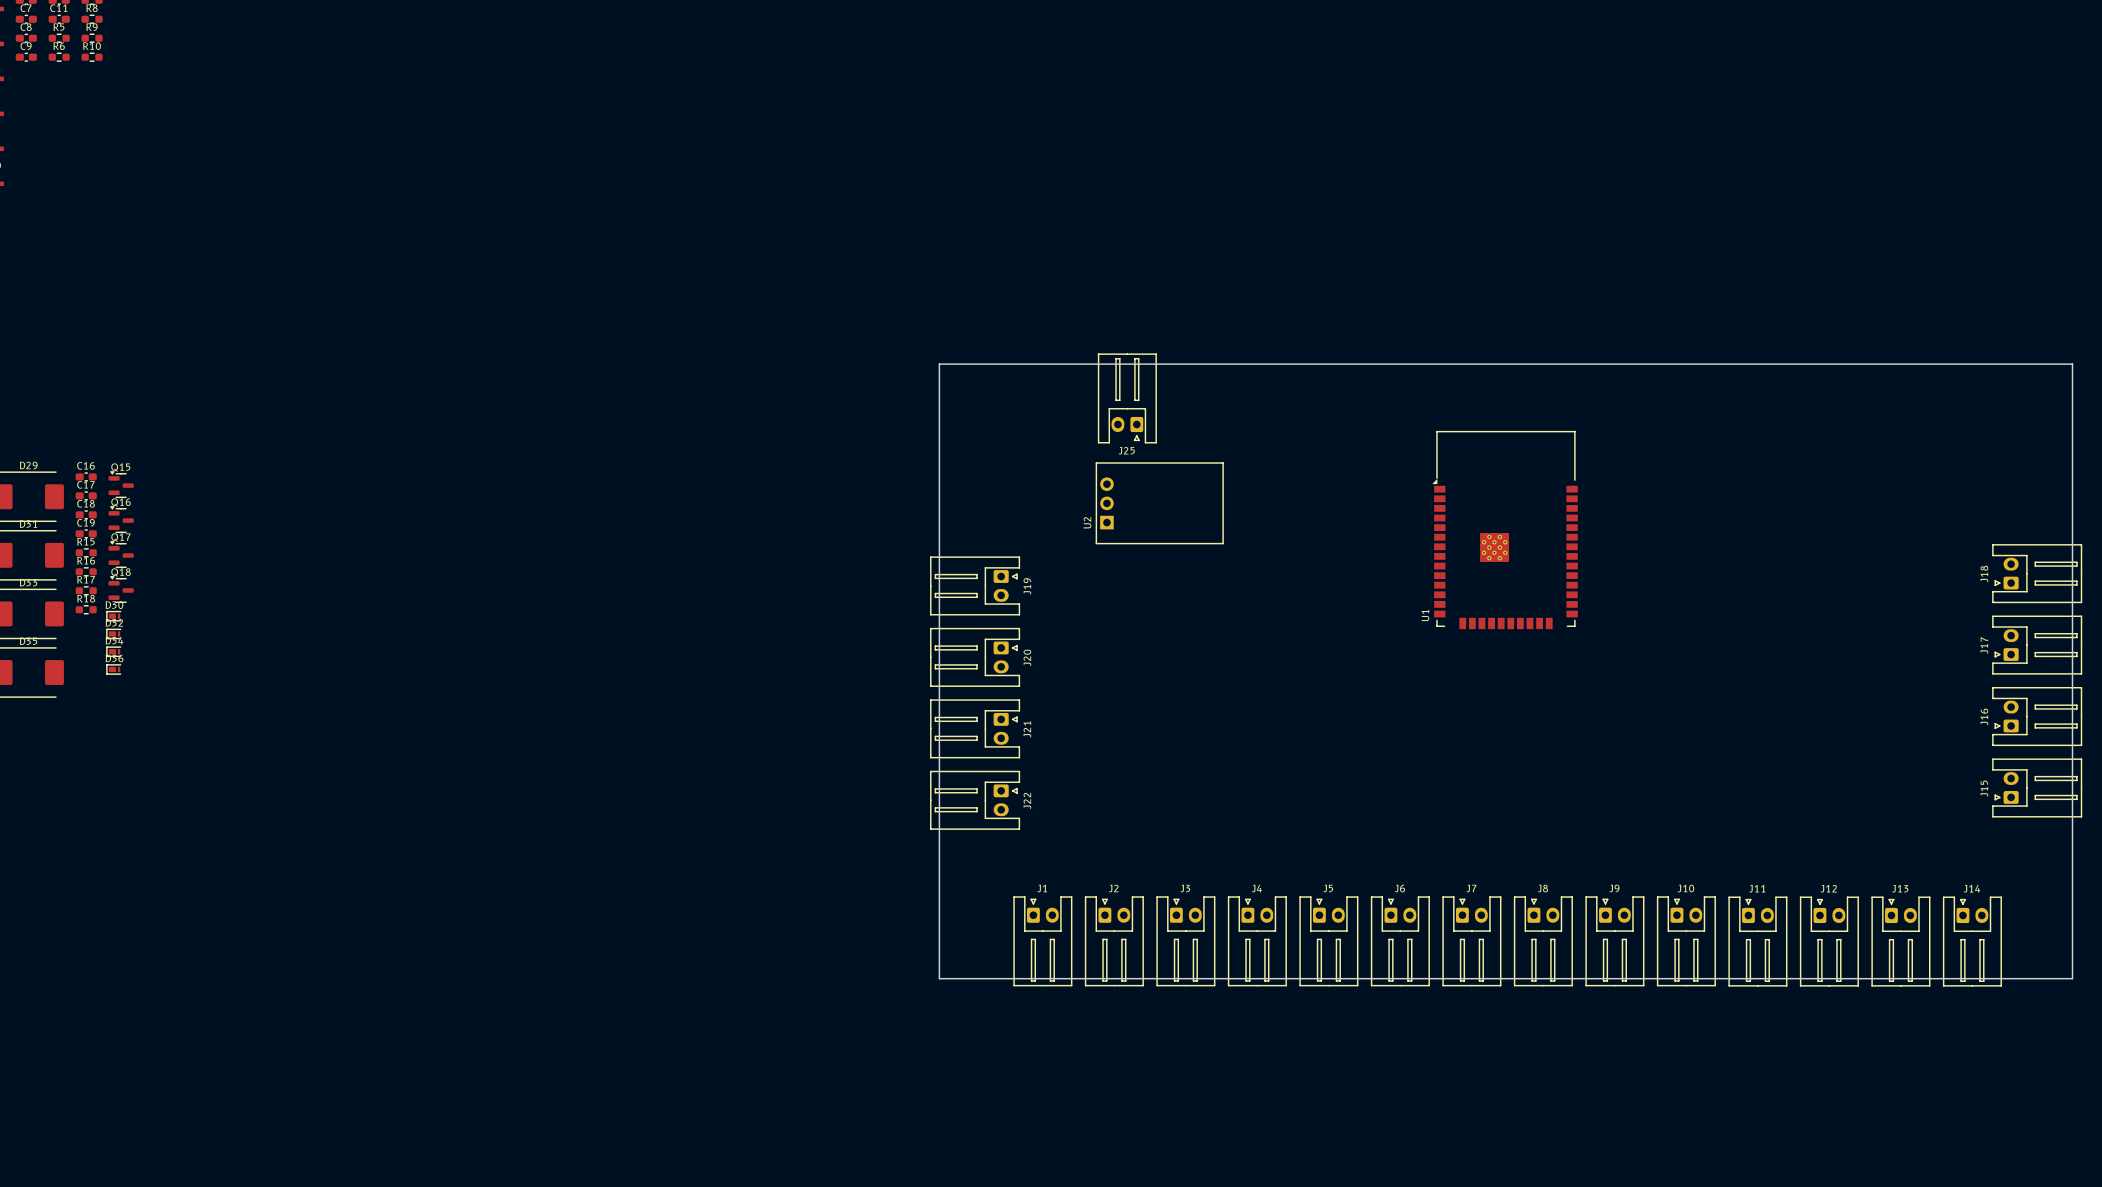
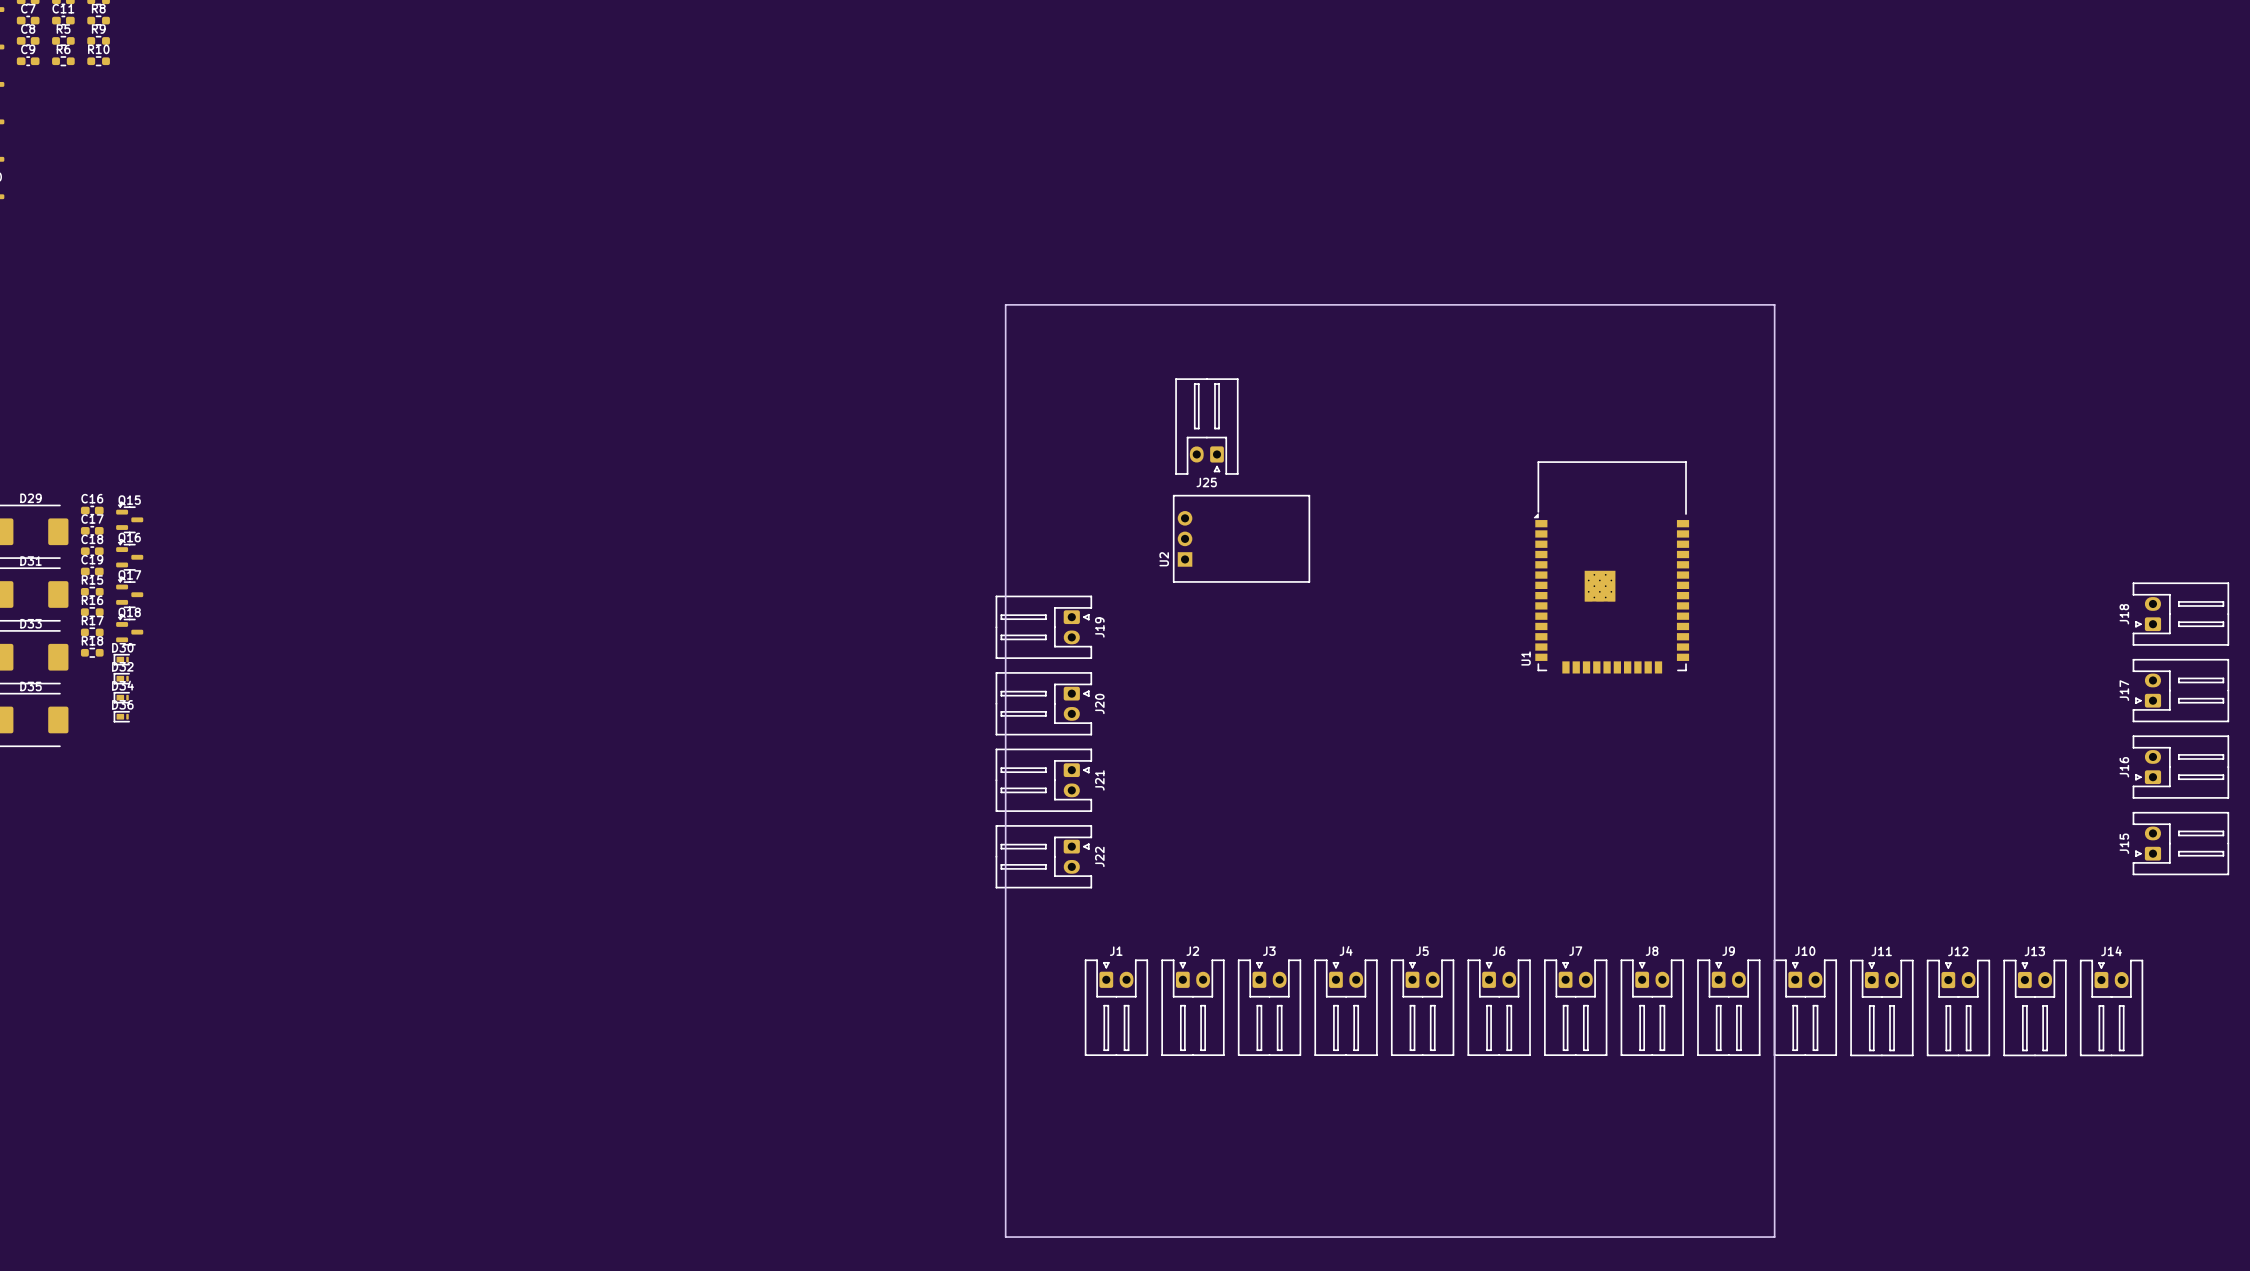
board edge: (939, 364) (2072, 364) (2072, 978) (939, 978) -> (1005, 389) (1005, 304) (1774, 304) (1774, 1237) (1005, 1237) (1005, 1047)

